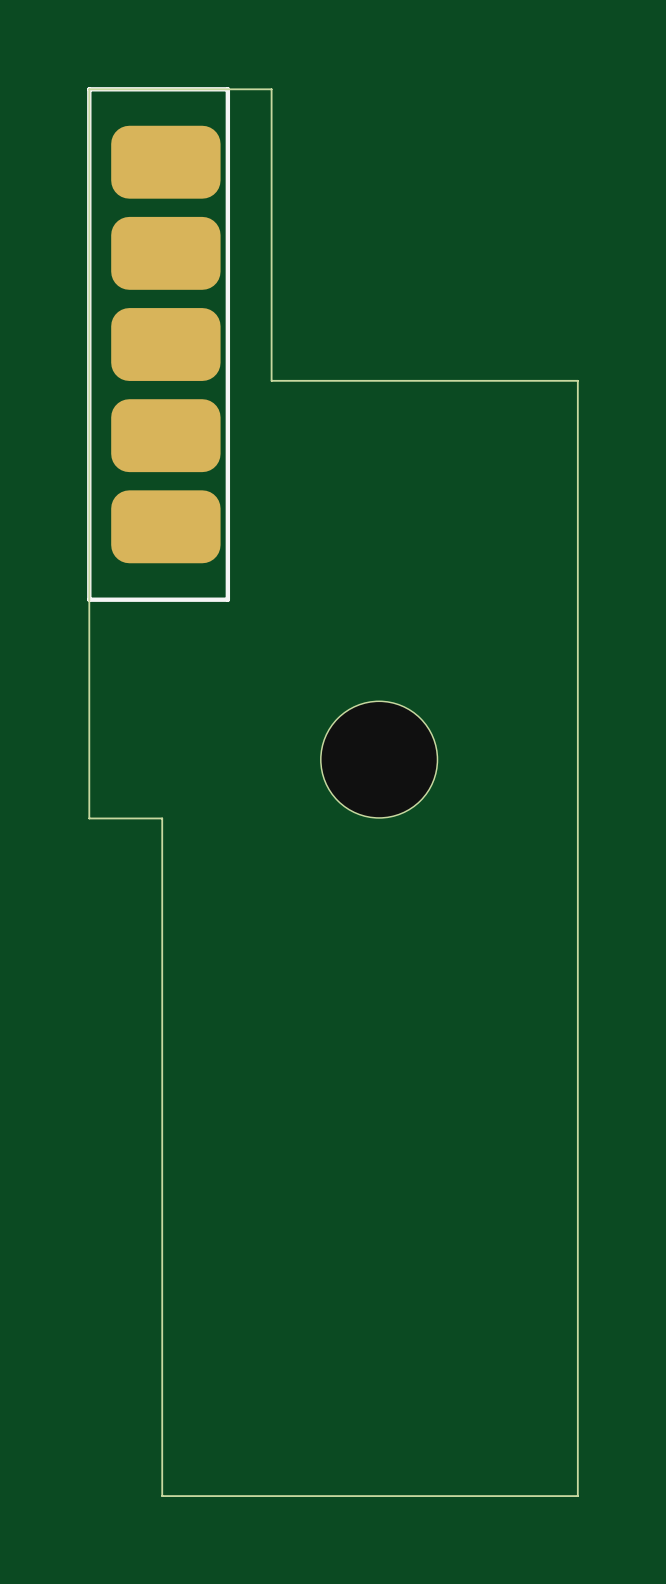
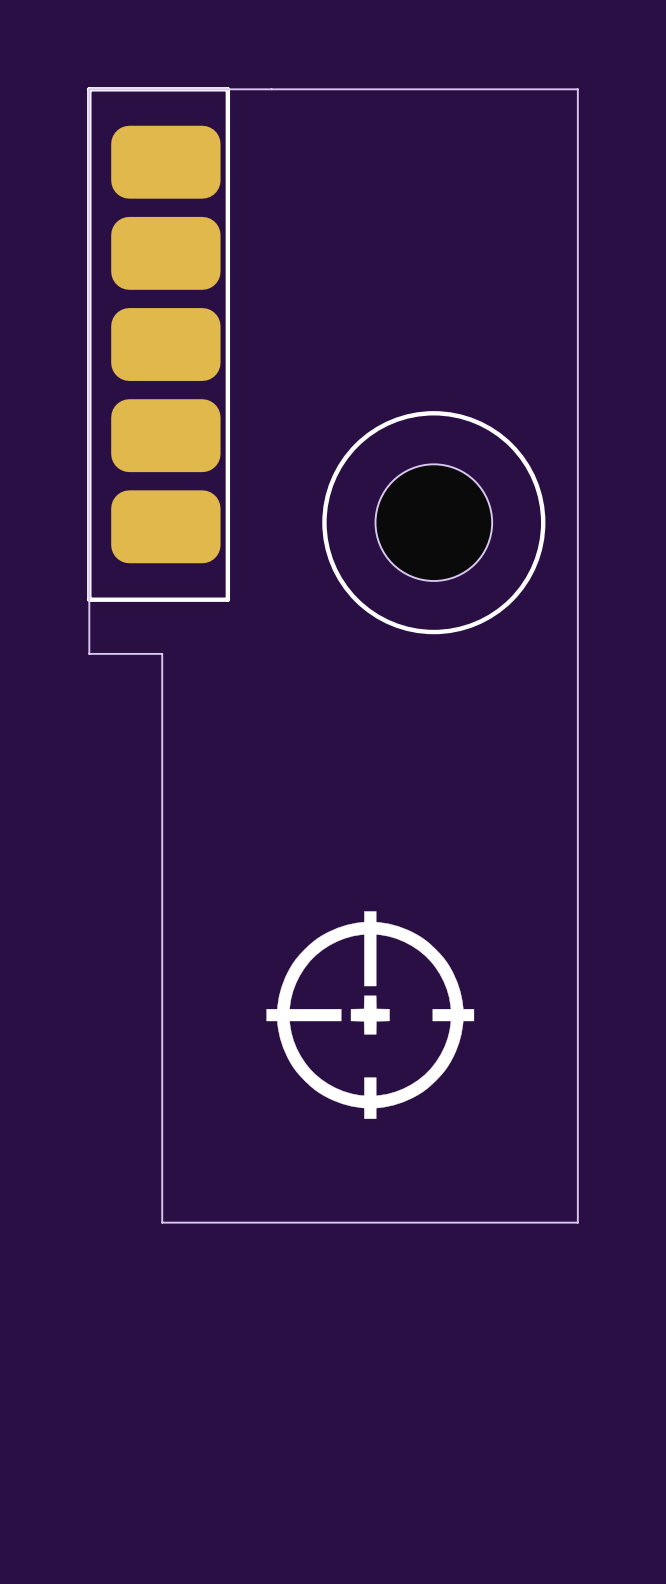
board edge: (271, 89) (271, 380) (577, 380) -> (271, 89) (577, 89) (577, 380)
drawing: none -> [322, 411, 546, 635]
board edge: (89, 653) (89, 818) (162, 818) -> (89, 653) (162, 653) (162, 818)
part position: (379, 759) -> (433, 522)
drawing: none -> [266, 911, 475, 1119]
board edge: (577, 1222) (577, 1496) (162, 1496) (162, 1222) -> (577, 1222) (162, 1222)

